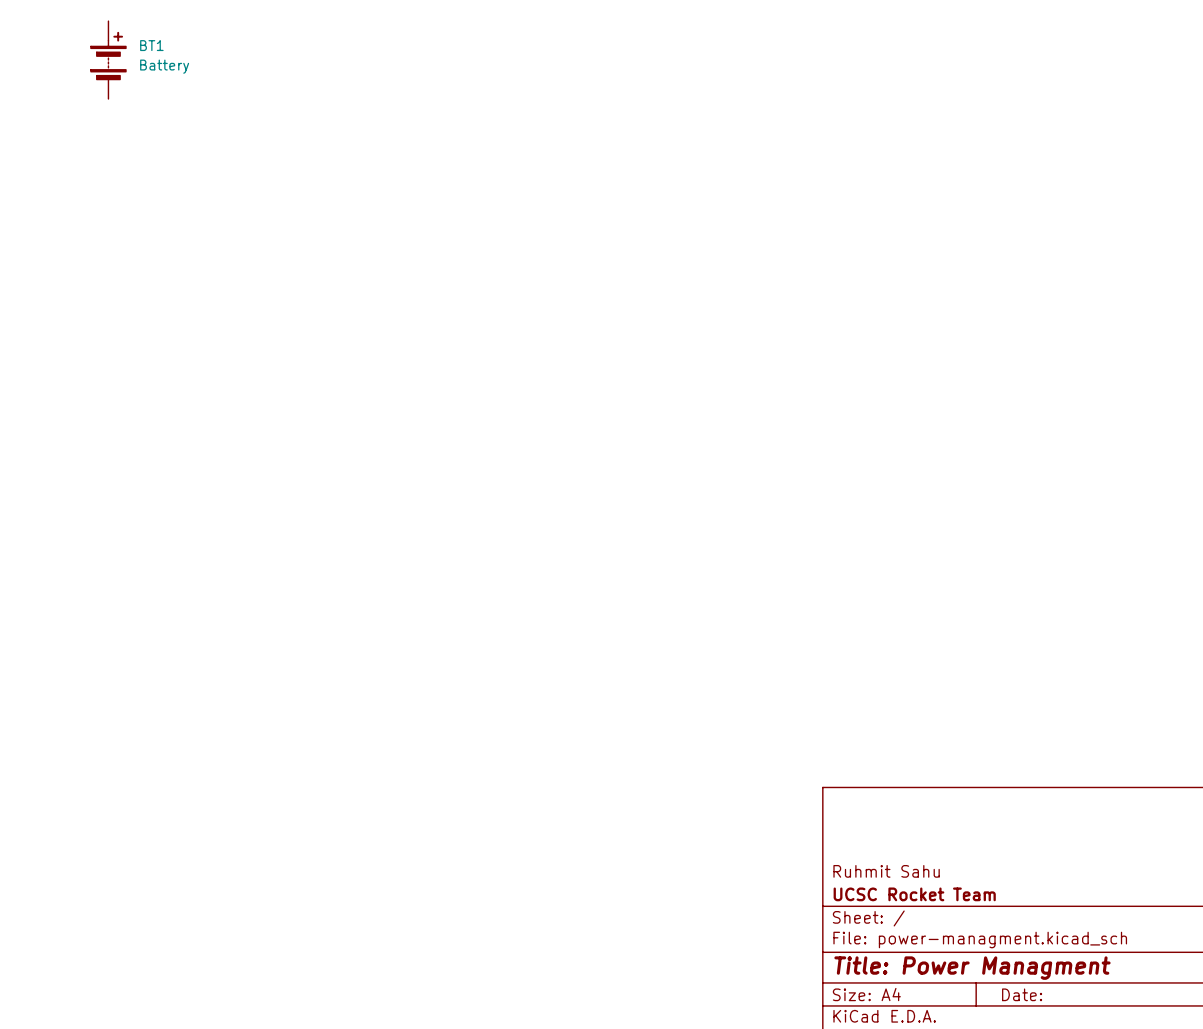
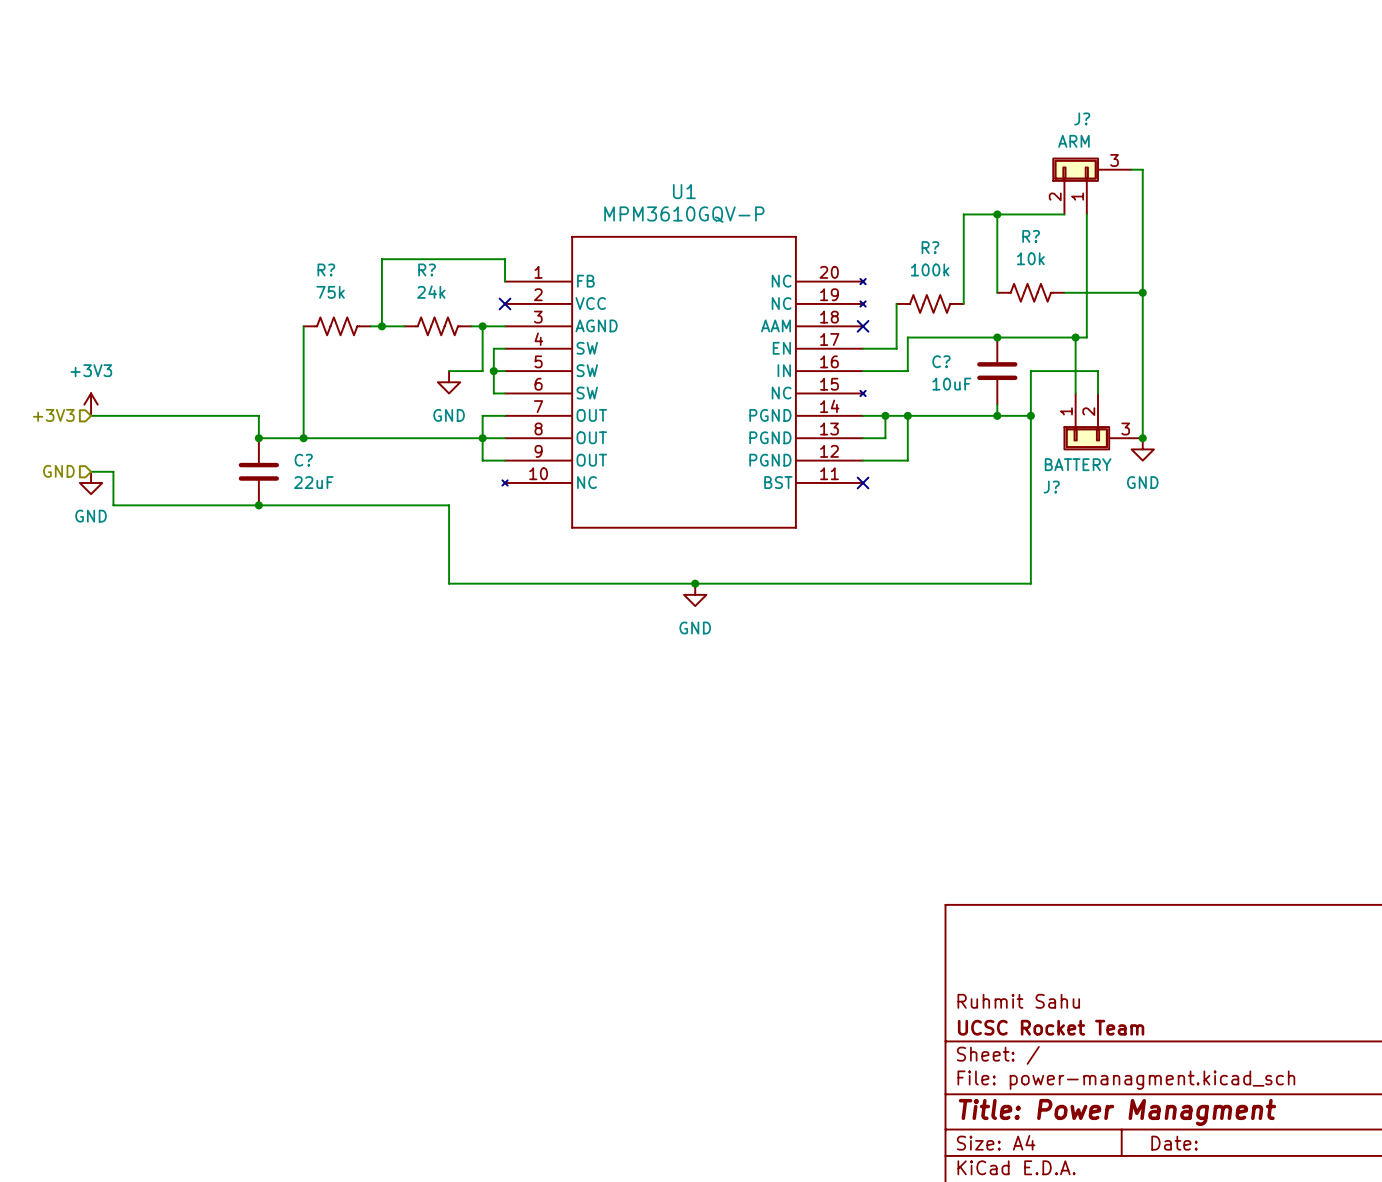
BT1: Battery (108, 60) -> none
wire: none -> (1131, 169) (1142, 169) (1142, 438)
J?: none -> ARM (1092, 186)
wire: none -> (997, 214) (997, 292)
junction: none -> (997, 214)
wire: none -> (1064, 214) (963, 214) (963, 303)
wire: none -> (1086, 214) (1086, 337) (907, 337) (907, 371) (863, 371)
wire: none -> (505, 281) (505, 259) (381, 259) (381, 326)
R?: none -> 10k (1030, 292)
wire: none -> (1064, 292) (1142, 292)
junction: none -> (1142, 292)
no-connect mark: none -> (505, 303)
wire: none -> (896, 303) (896, 348) (863, 348)
R?: none -> 100k (930, 303)
wire: none -> (303, 326) (303, 438)
R?: none -> 75k (337, 326)
wire: none -> (370, 326) (404, 326)
junction: none -> (381, 326)
R?: none -> 24k (437, 326)
wire: none -> (471, 326) (505, 326)
wire: none -> (482, 326) (482, 371) (449, 371)
junction: none -> (482, 326)
no-connect mark: none -> (863, 326)
junction: none -> (997, 337)
wire: none -> (1075, 337) (1075, 393)
junction: none -> (1075, 337)
wire: none -> (505, 348) (493, 348) (493, 393) (505, 393)
wire: none -> (493, 371) (505, 371)
junction: none -> (493, 371)
C?: none -> 10uF (997, 371)
power symbol: none -> GND (449, 382)
U1: none -> MPM3610GQV-P (684, 382)
wire: none -> (1098, 393) (1098, 371) (1030, 371) (1030, 583) (449, 583) (449, 505) (113, 505) (113, 471) (91, 471)
power symbol: none -> +3V3 (91, 404)
wire: none -> (997, 404) (997, 415)
hierarchical label: none -> +3V3 (53, 415)
wire: none -> (91, 415) (258, 415) (258, 438) (505, 438)
wire: none -> (505, 415) (482, 415) (482, 460) (505, 460)
wire: none -> (863, 415) (1030, 415)
wire: none -> (885, 415) (885, 438) (863, 438)
junction: none -> (885, 415)
wire: none -> (907, 415) (907, 460) (863, 460)
junction: none -> (907, 415)
junction: none -> (997, 415)
junction: none -> (1030, 415)
J?: none -> BATTERY (1103, 421)
junction: none -> (258, 438)
junction: none -> (303, 438)
junction: none -> (482, 438)
junction: none -> (1142, 438)
power symbol: none -> GND (1142, 449)
hierarchical label: none -> GND (58, 471)
C?: none -> 22uF (258, 471)
power symbol: none -> GND (91, 482)
no-connect mark: none -> (863, 482)
junction: none -> (258, 505)
junction: none -> (695, 583)
power symbol: none -> GND (695, 594)

